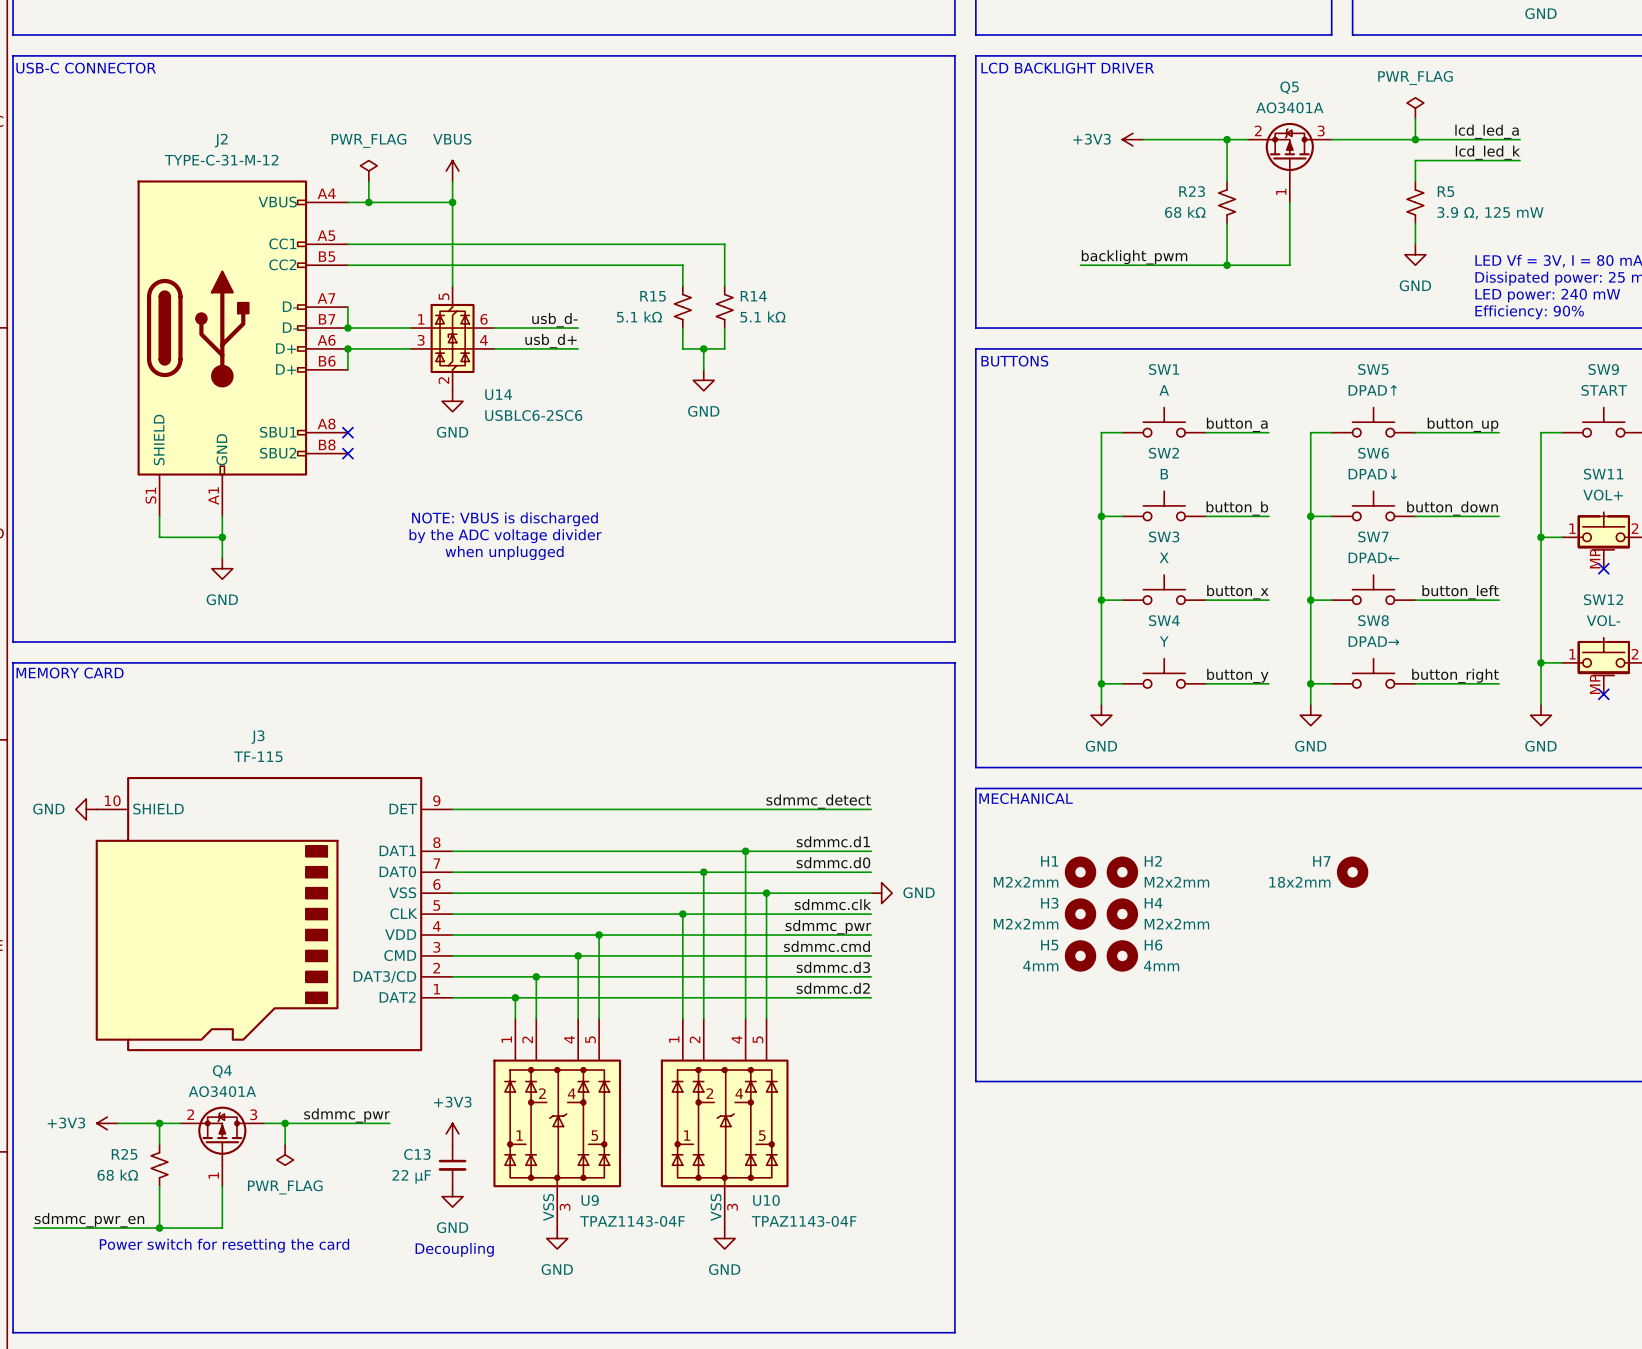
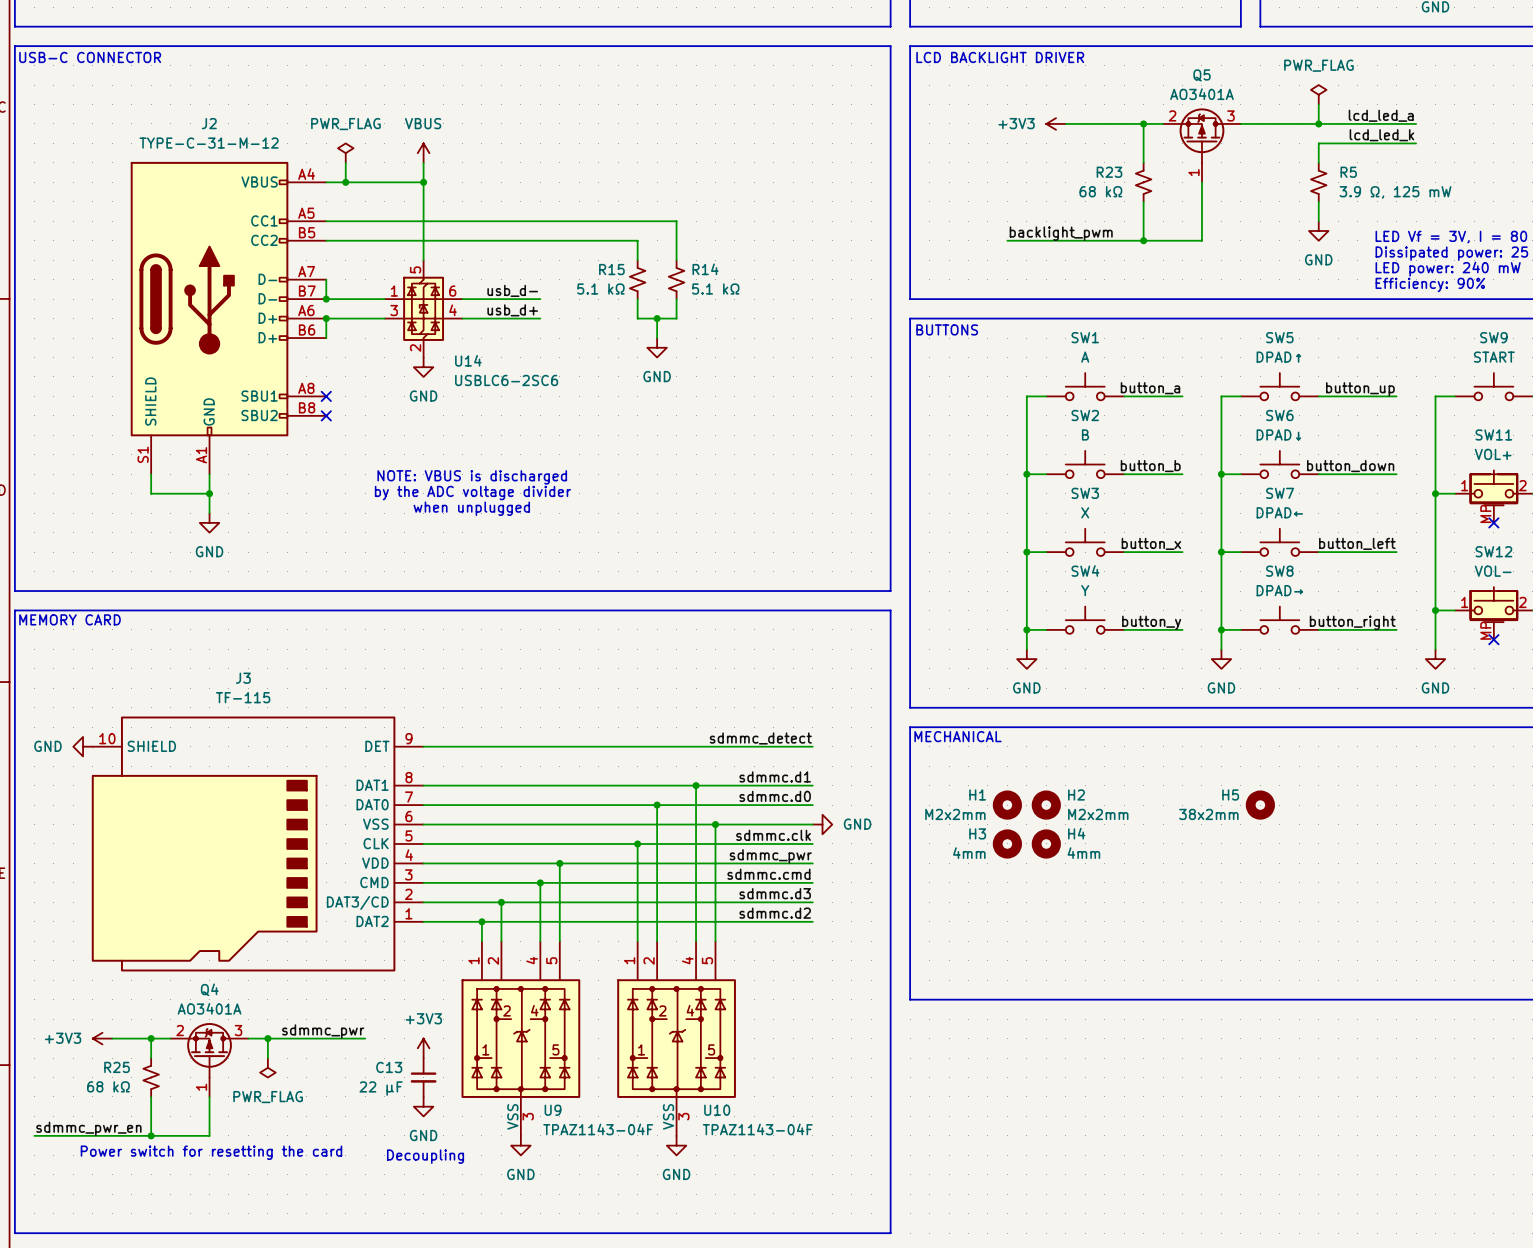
H7 name: H7 (1321, 861) -> H5 (1230, 794)
H7 value: 18x2mm (1299, 882) -> 38x2mm (1208, 814)
H3 value: M2x2mm (1026, 924) -> 4mm (969, 853)
H4 value: M2x2mm (1176, 924) -> 4mm (1083, 853)
H5: 4mm (1080, 955) -> none
H6: 4mm (1122, 955) -> none

